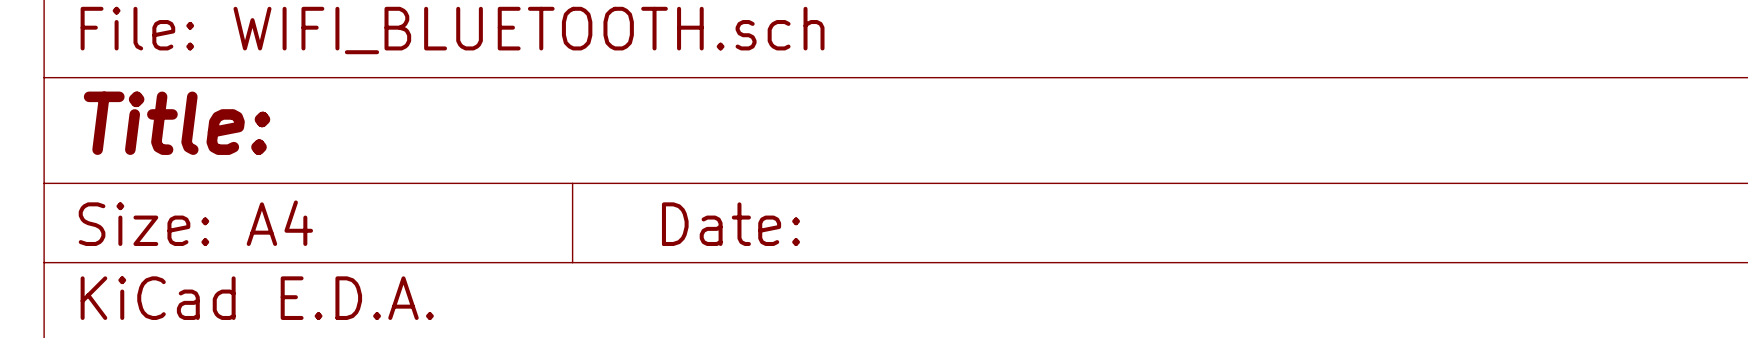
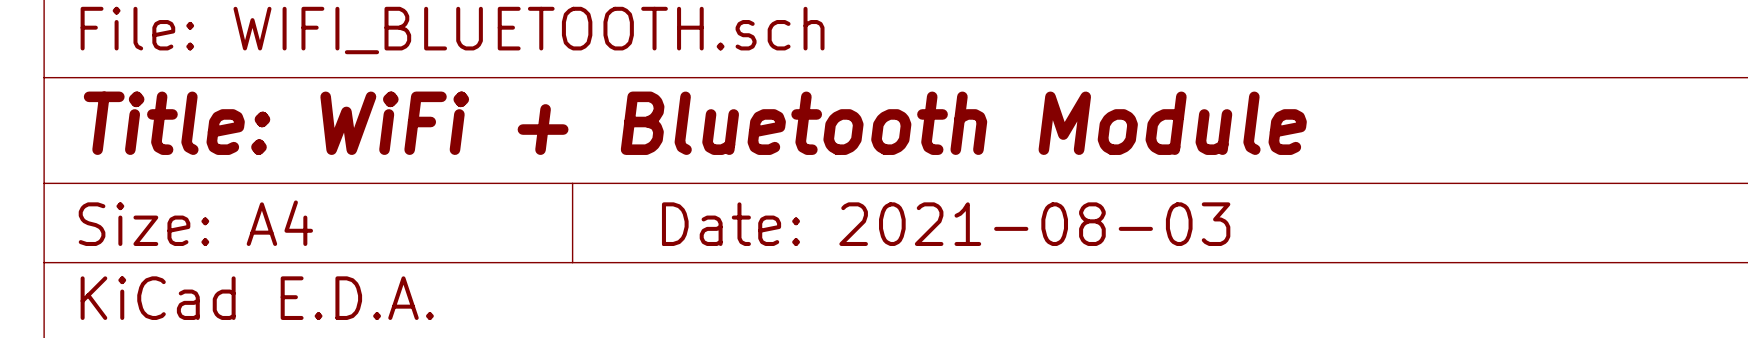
title block: Title: (177, 123) -> Title: WiFi + Bluetooth Module (695, 123)
title block: Date: (730, 224) -> Date: 2021-08-03 (946, 224)

